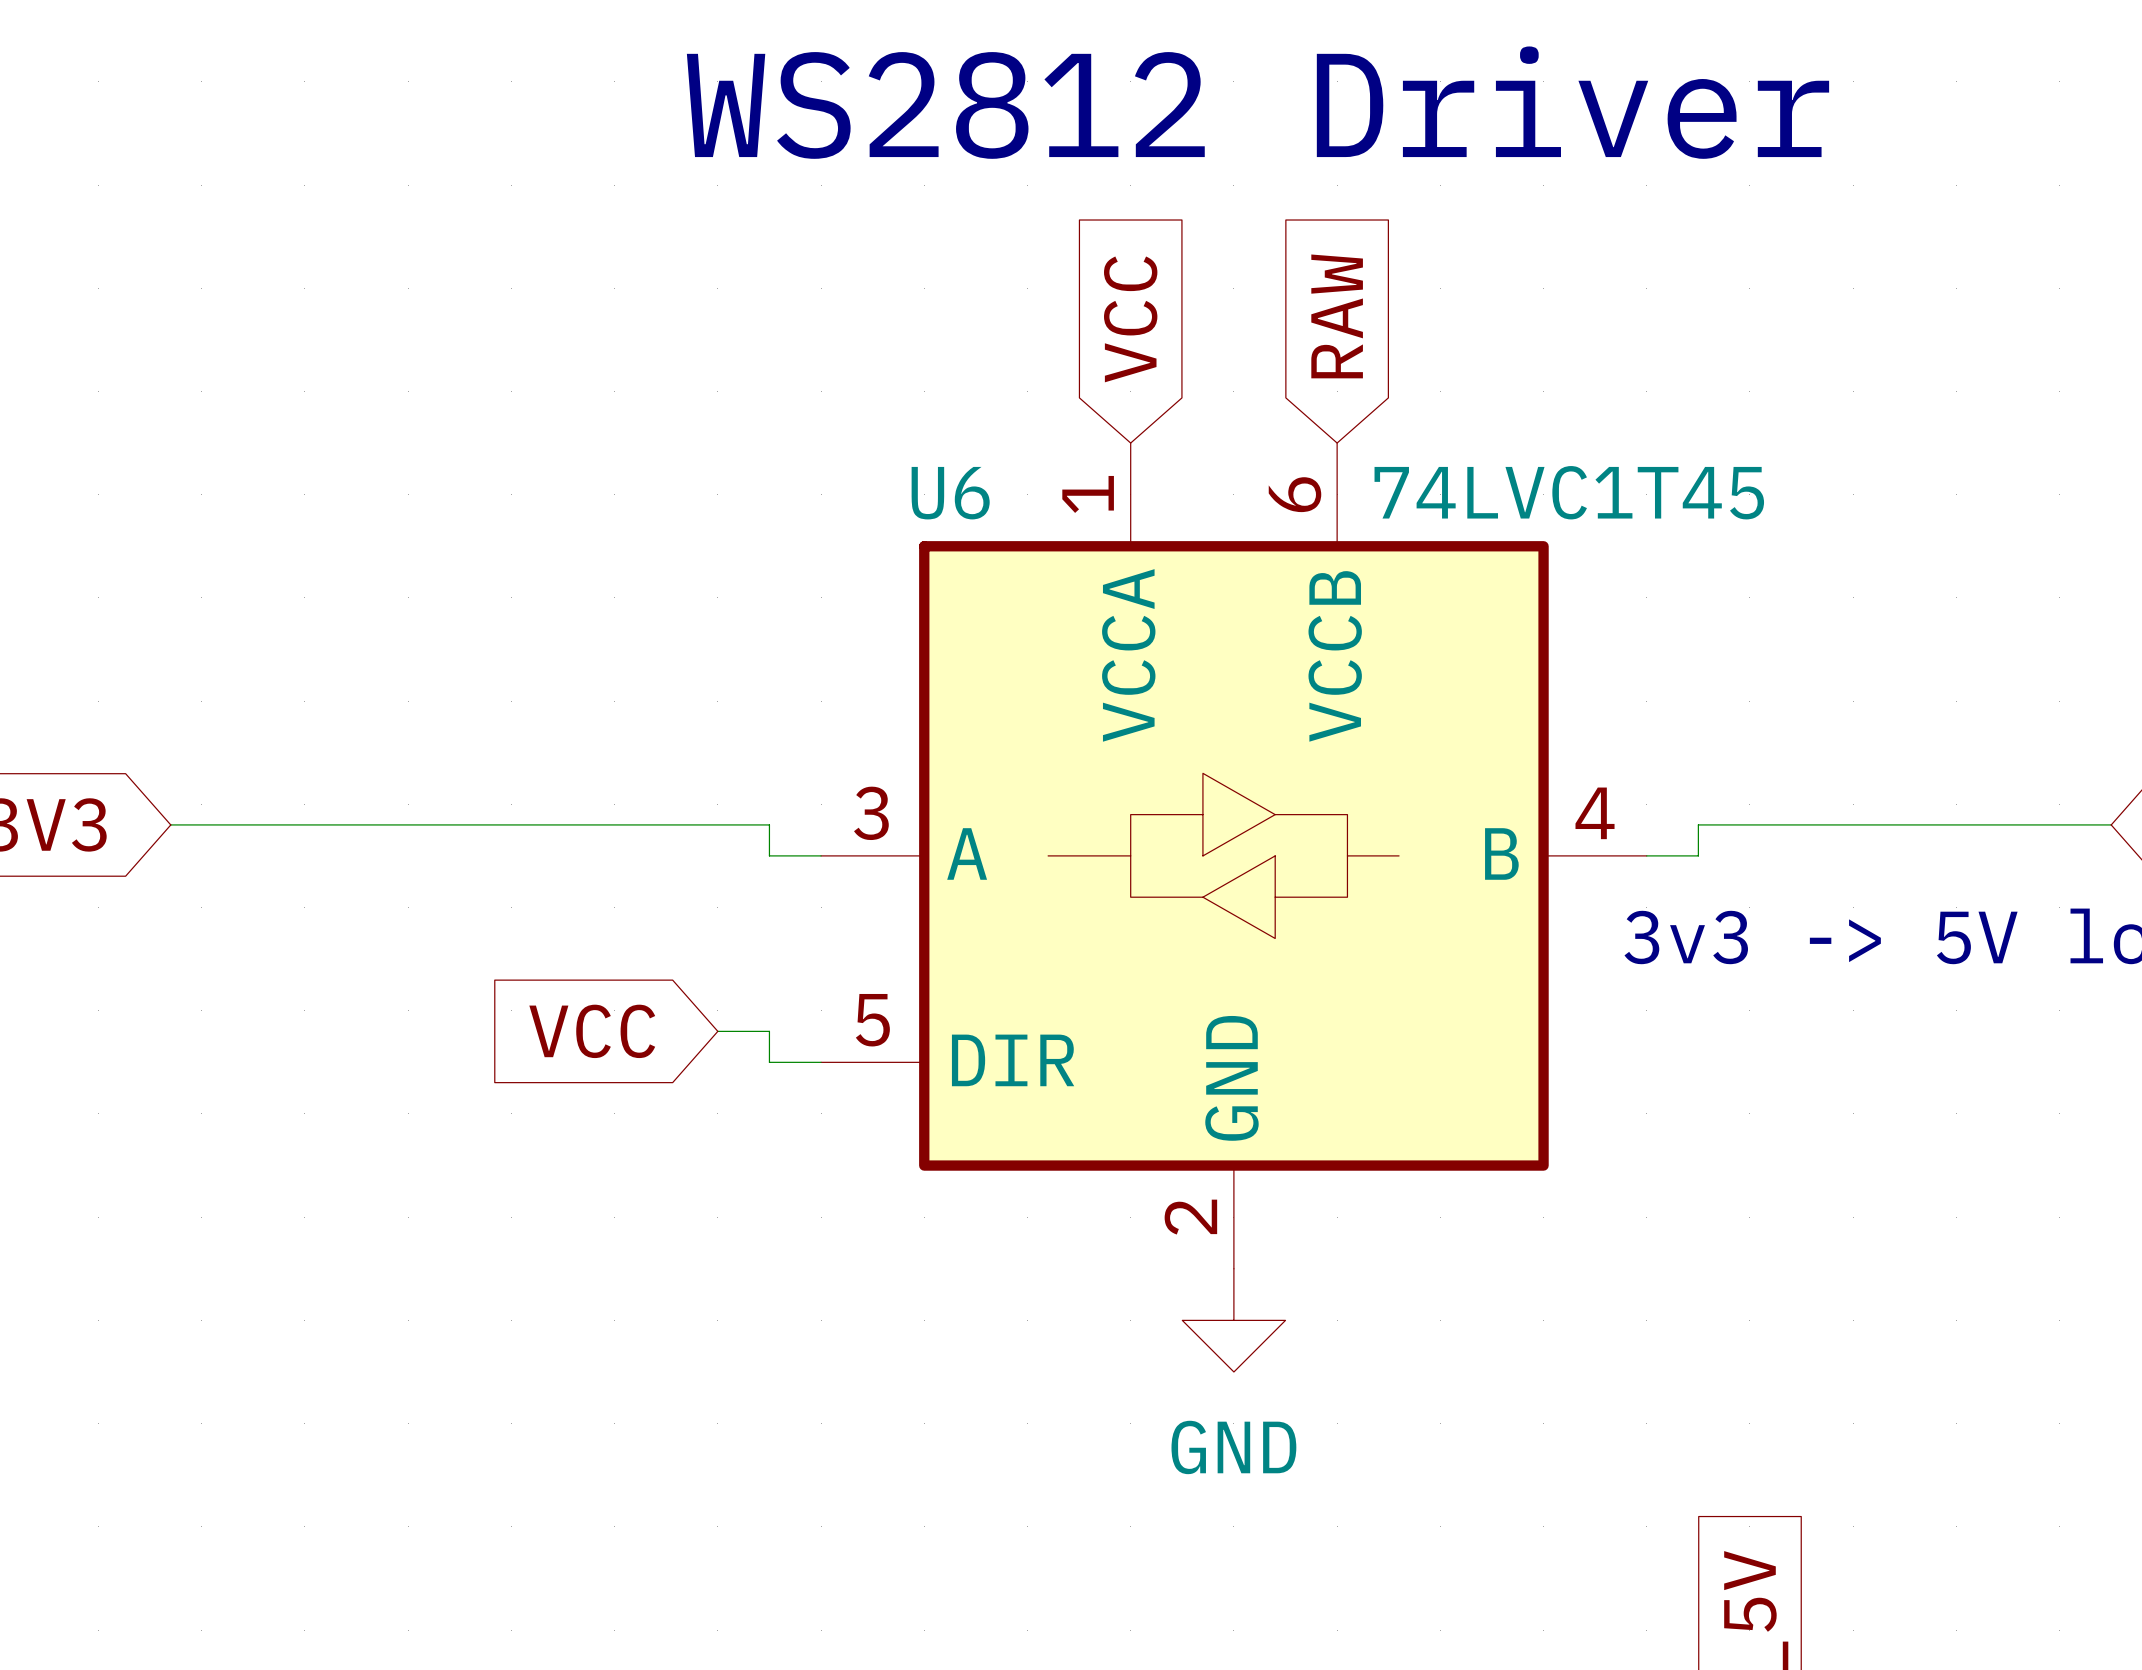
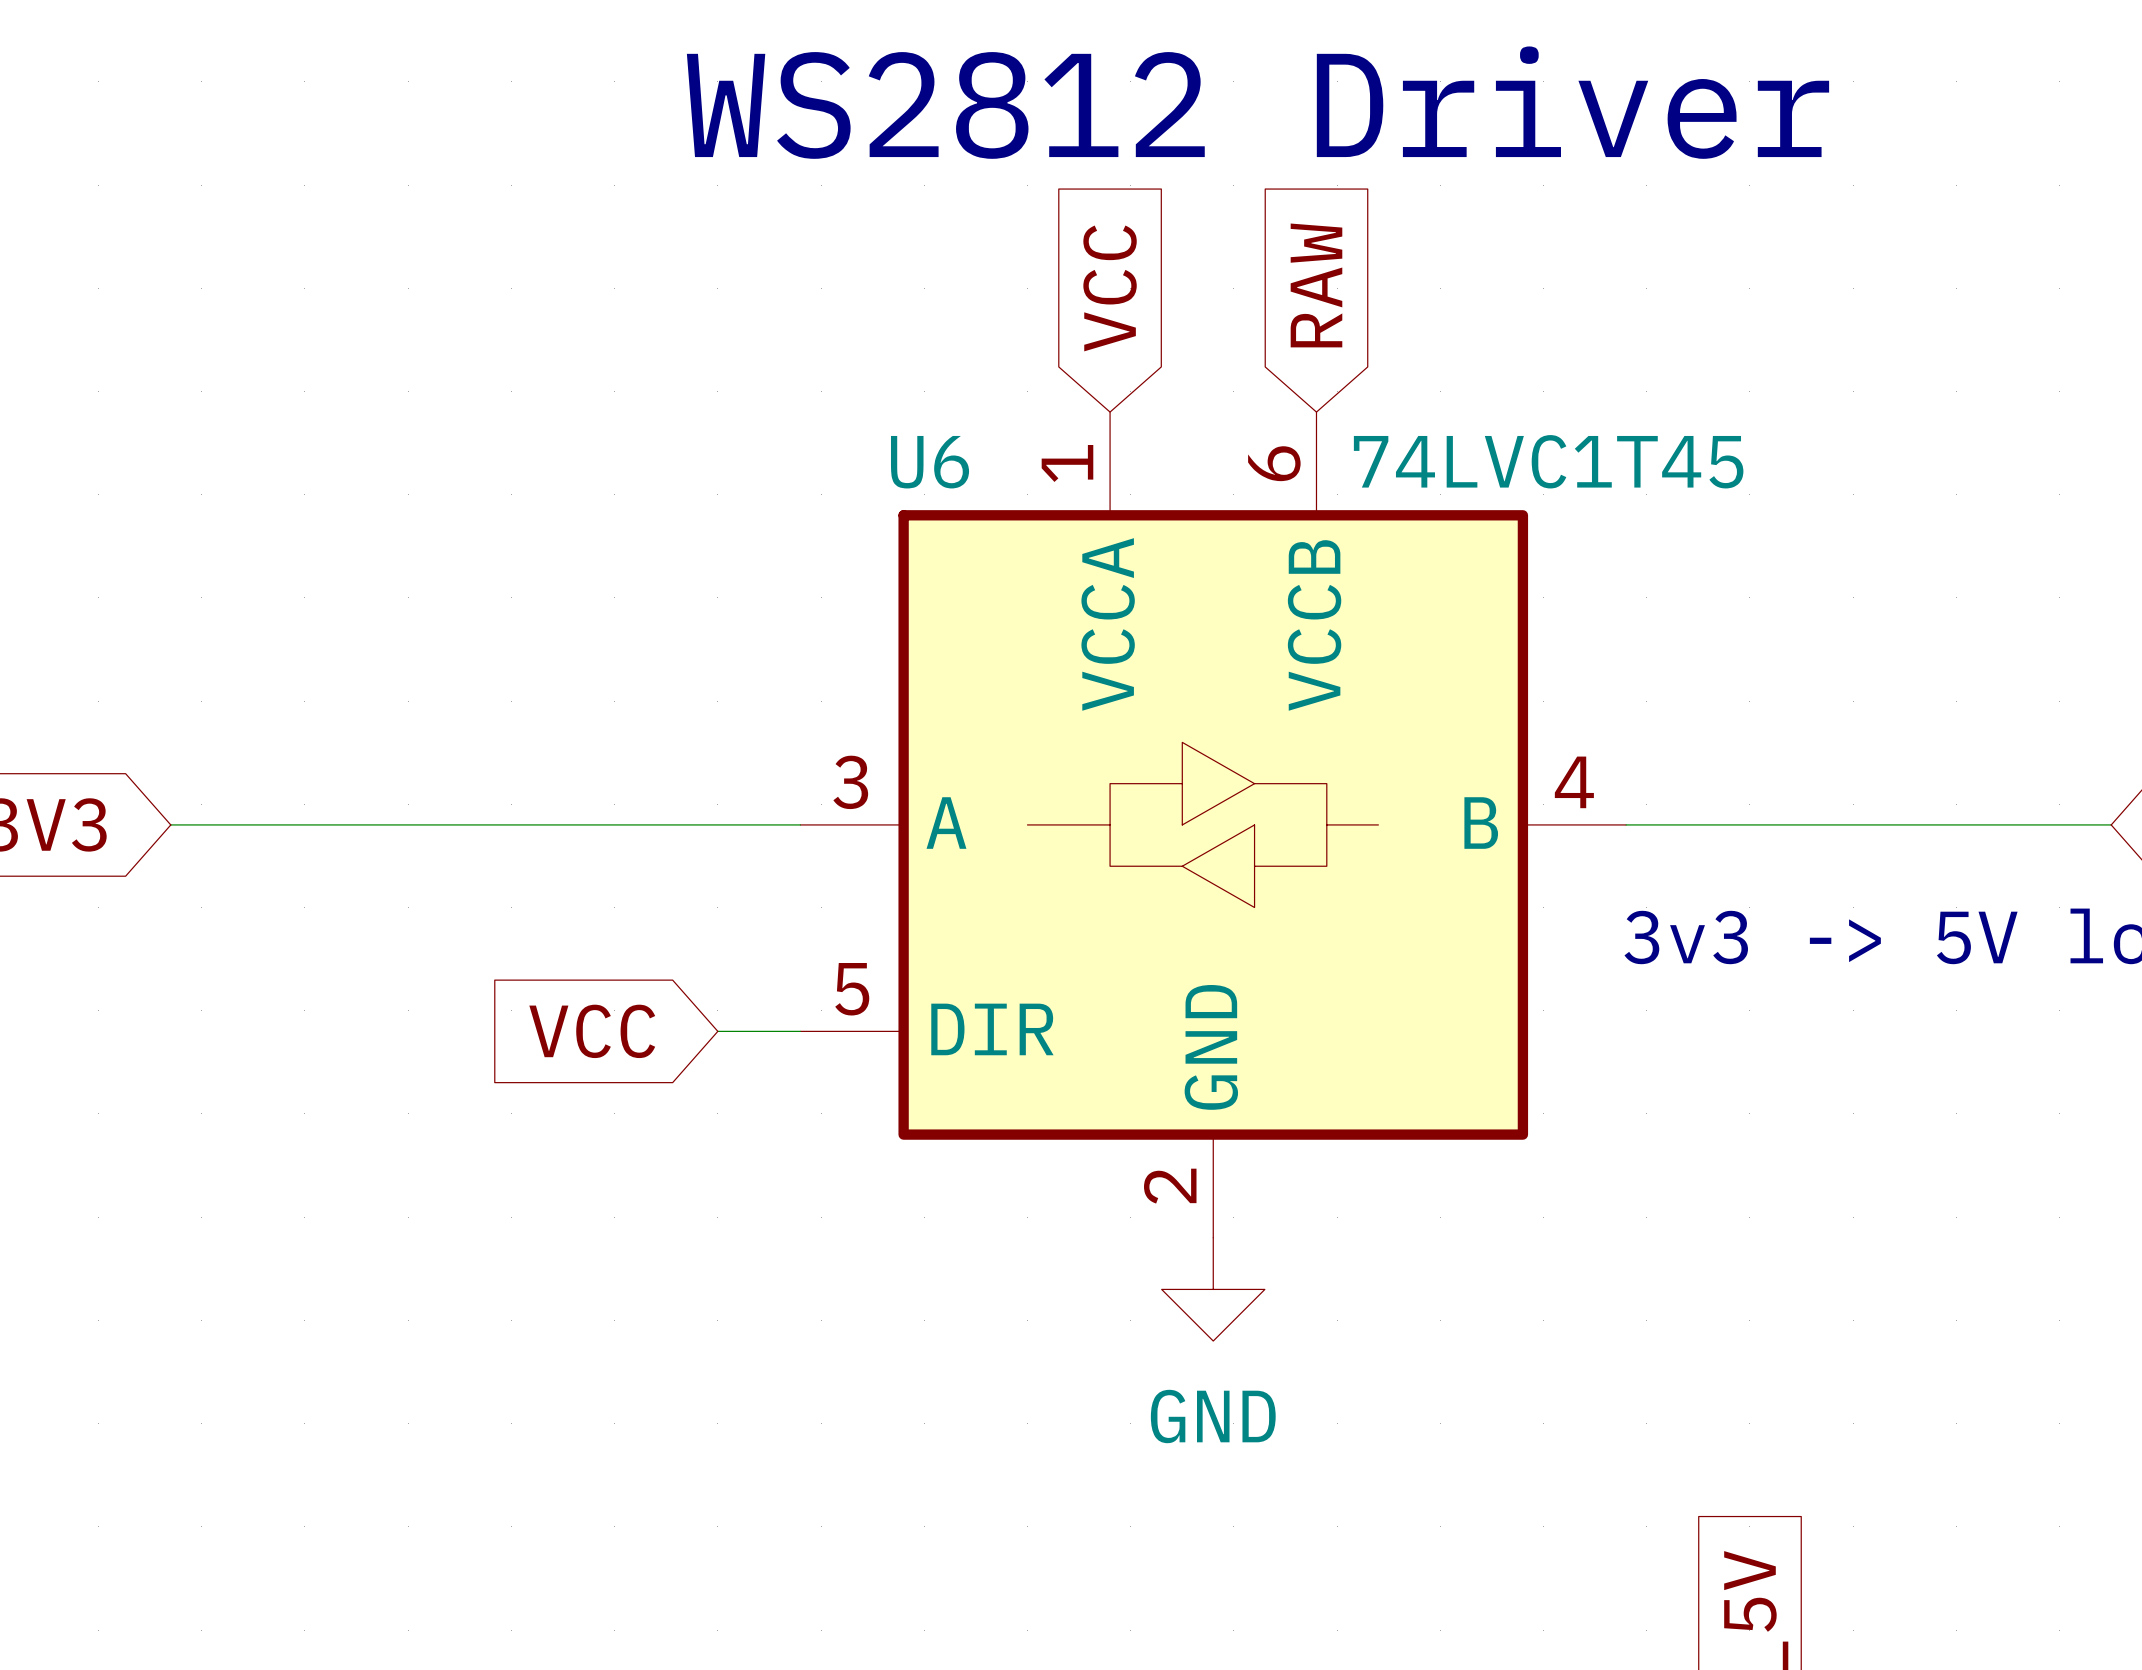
global label position: RAW (1337, 316) -> RAW (1316, 285)
global label position: VCC (1130, 319) -> VCC (1110, 288)
wire: (769, 824) (769, 855) (821, 855) -> (769, 824) (800, 824)
wire: (1698, 824) (1698, 855) (1646, 855) -> (1698, 824) (1626, 824)
U6 position: (1233, 855) -> (1213, 824)
wire: (769, 1031) (769, 1062) (821, 1062) -> (769, 1031) (800, 1031)
power symbol position: GND (1233, 1320) -> GND (1213, 1289)

